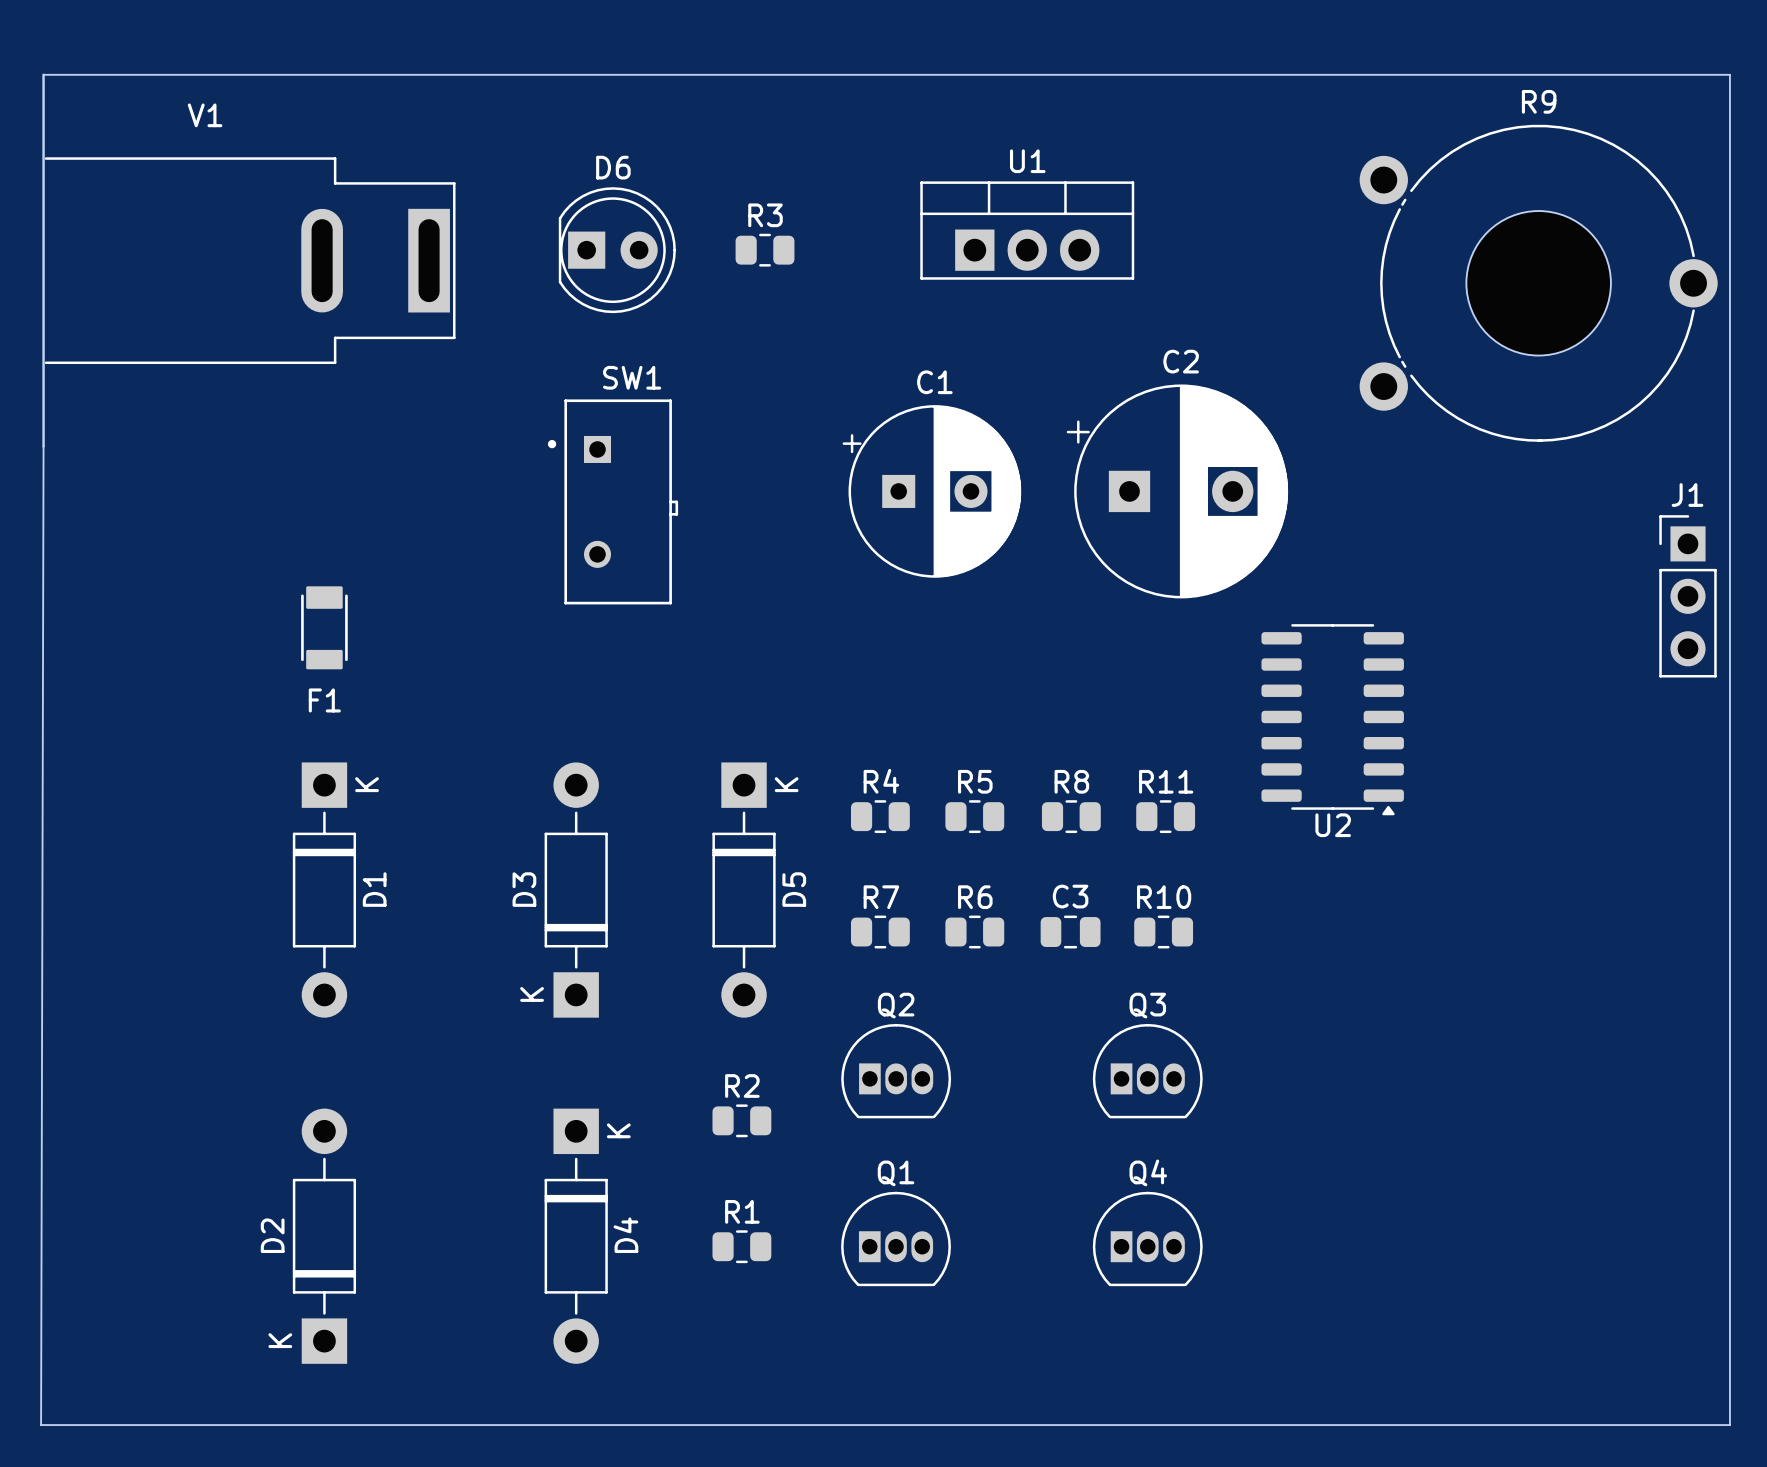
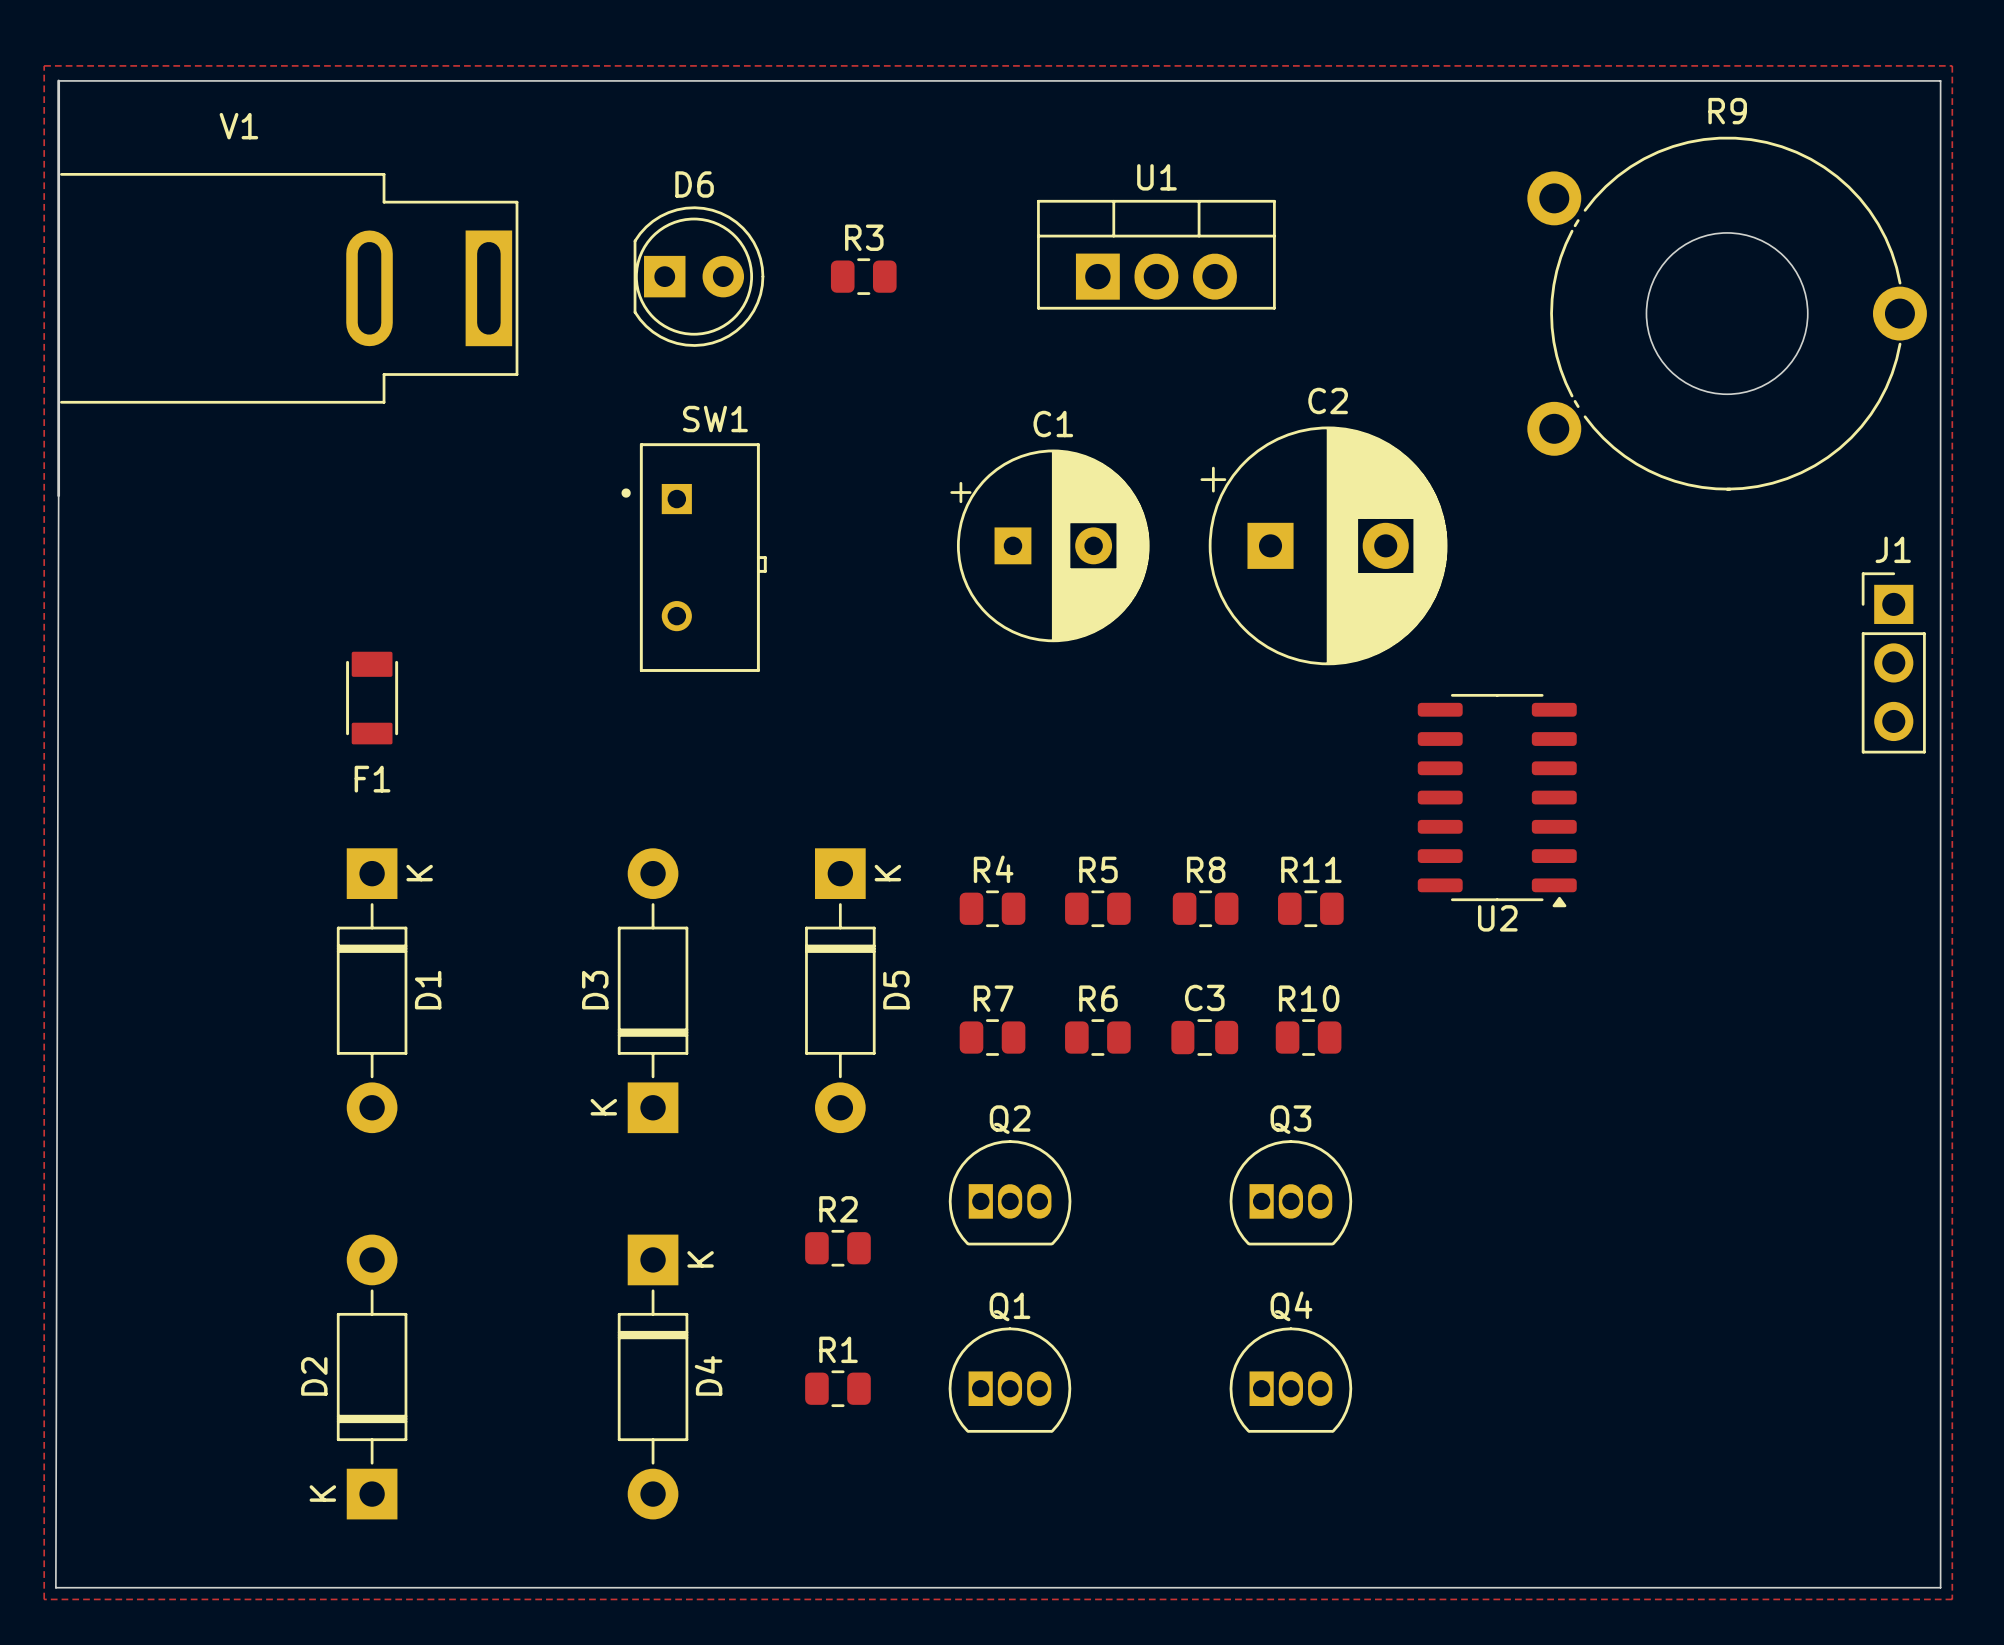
zone outline: none -> (44, 65) (1952, 65) (1952, 1599) (44, 1599) (44, 65)

